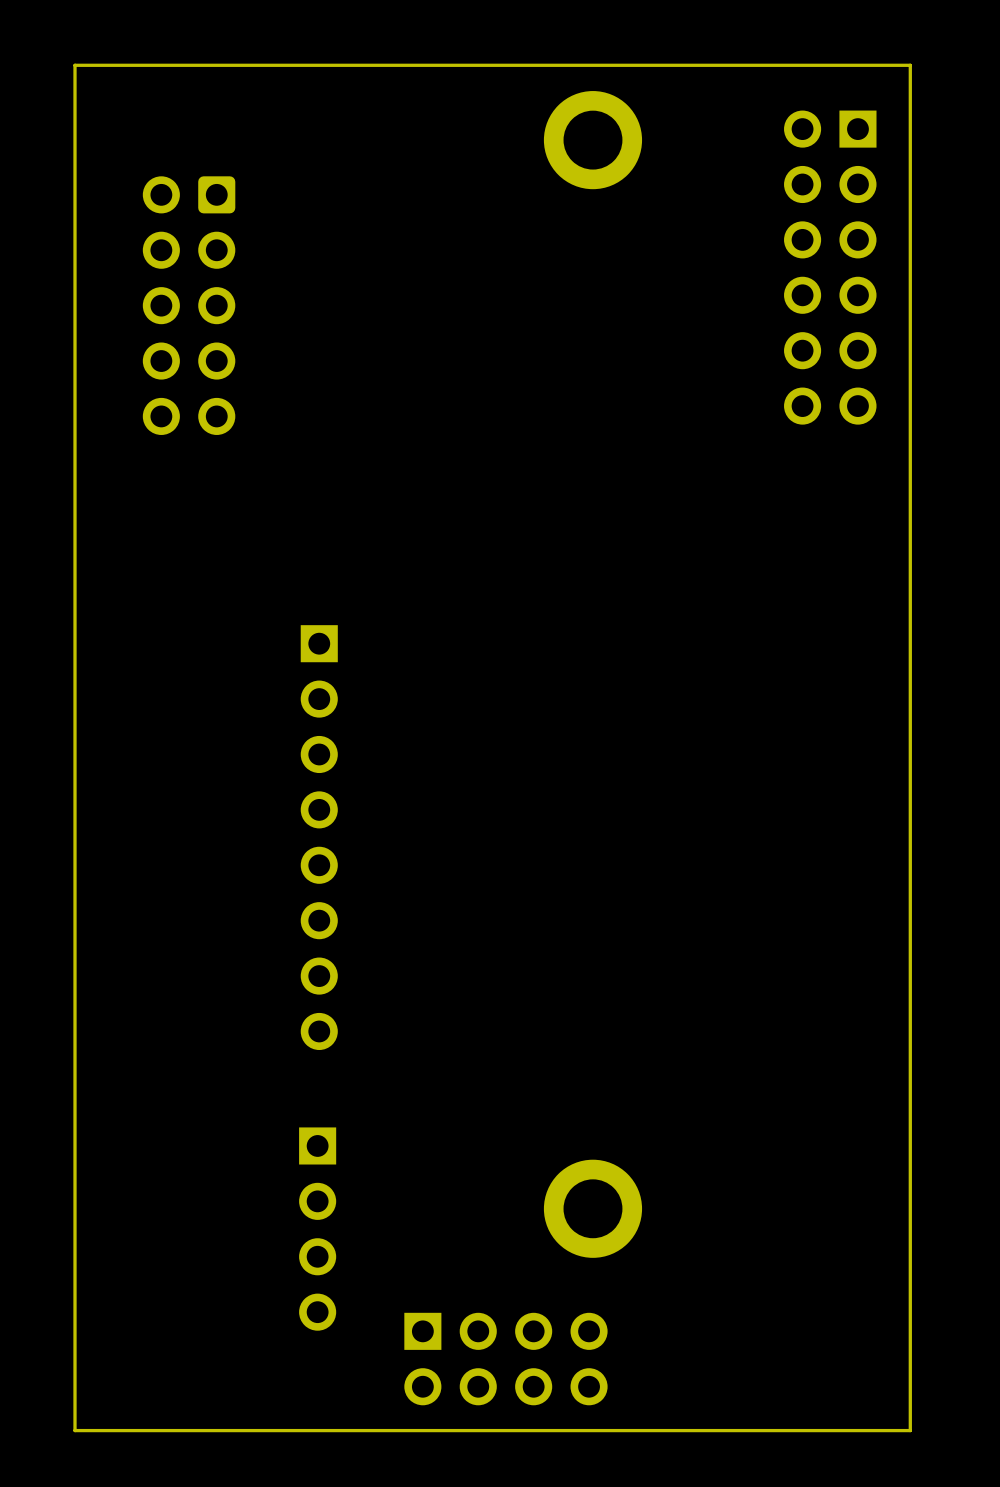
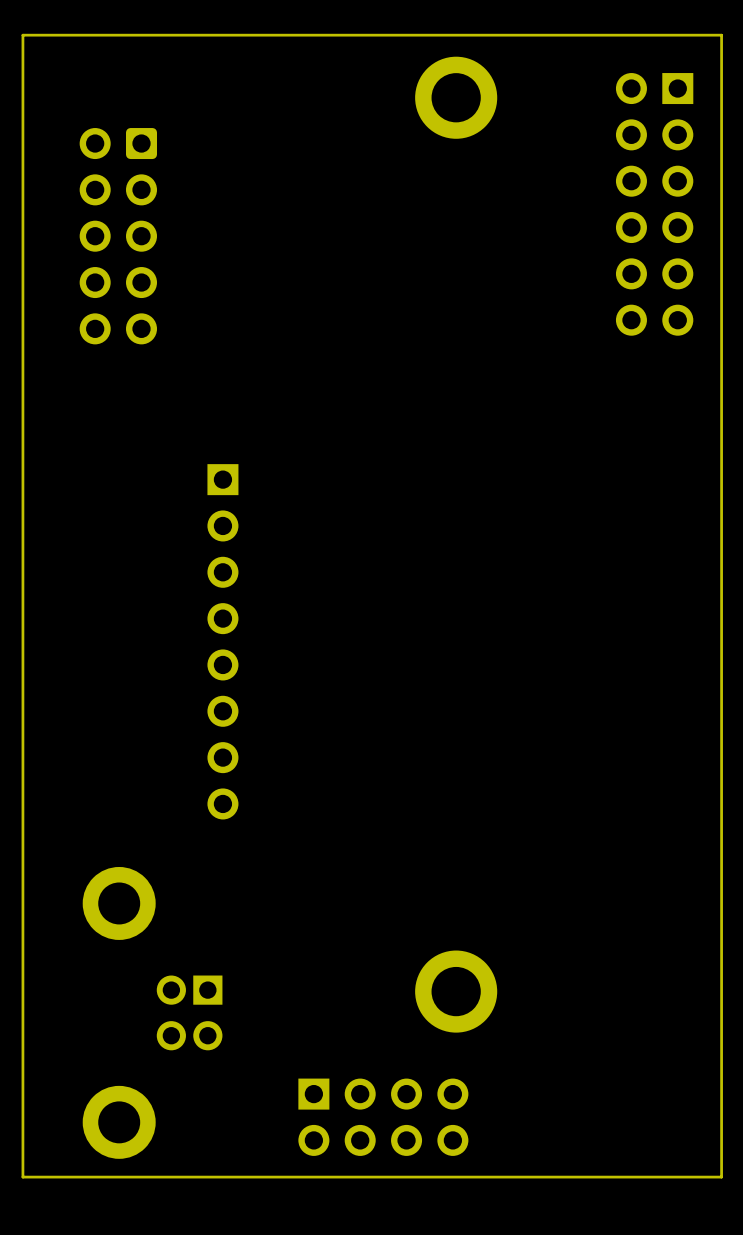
part position: (319, 837) -> (222, 641)
part: (317, 1229) -> none
part: none -> (152, 1012)

